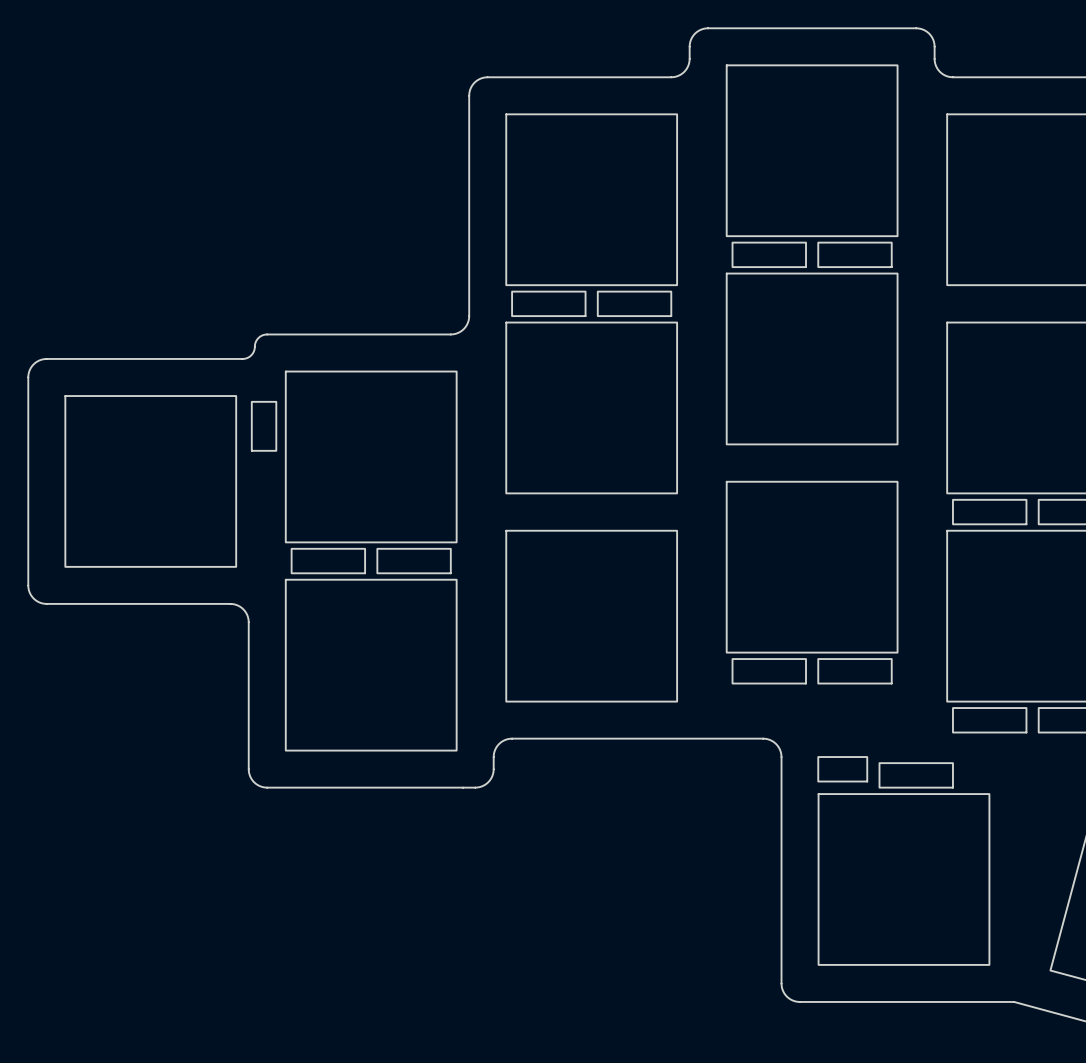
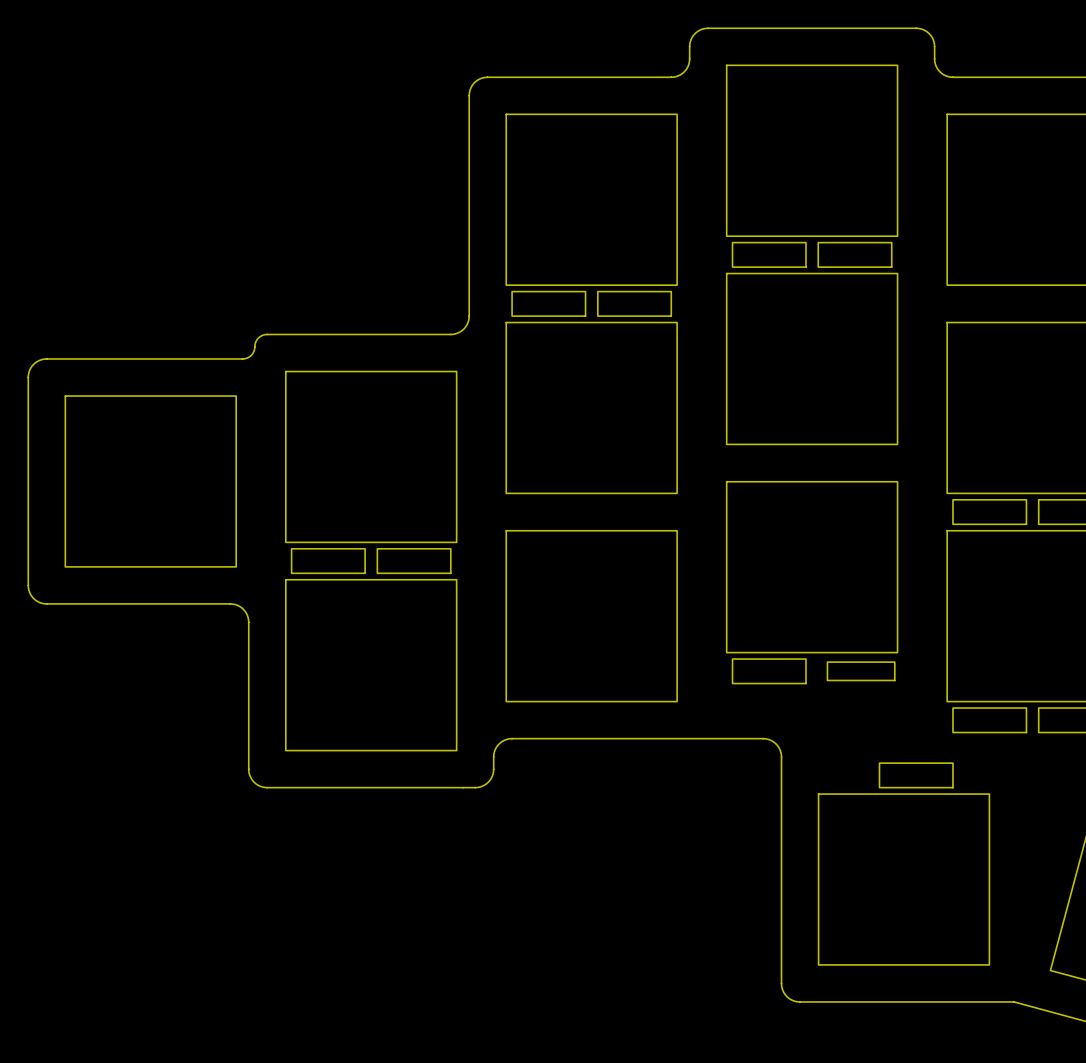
drawing: [251, 401, 278, 452] -> none
drawing shape: [817, 658, 893, 685] -> [826, 661, 896, 682]
drawing: [817, 756, 868, 783] -> none

